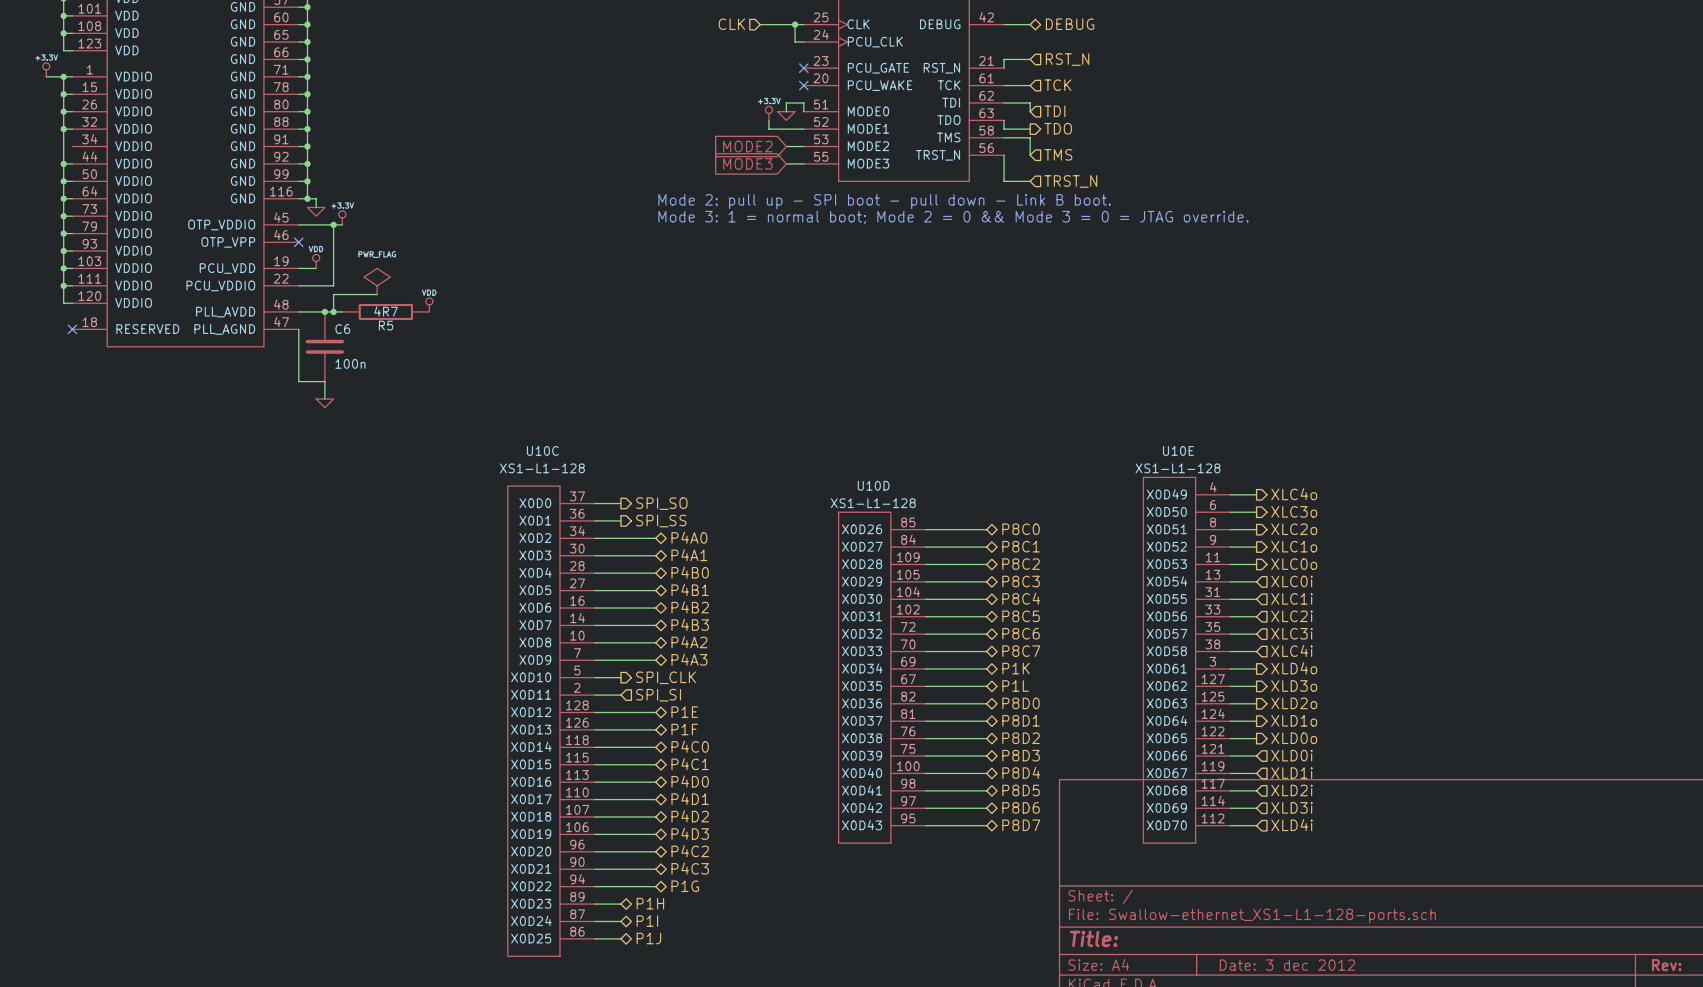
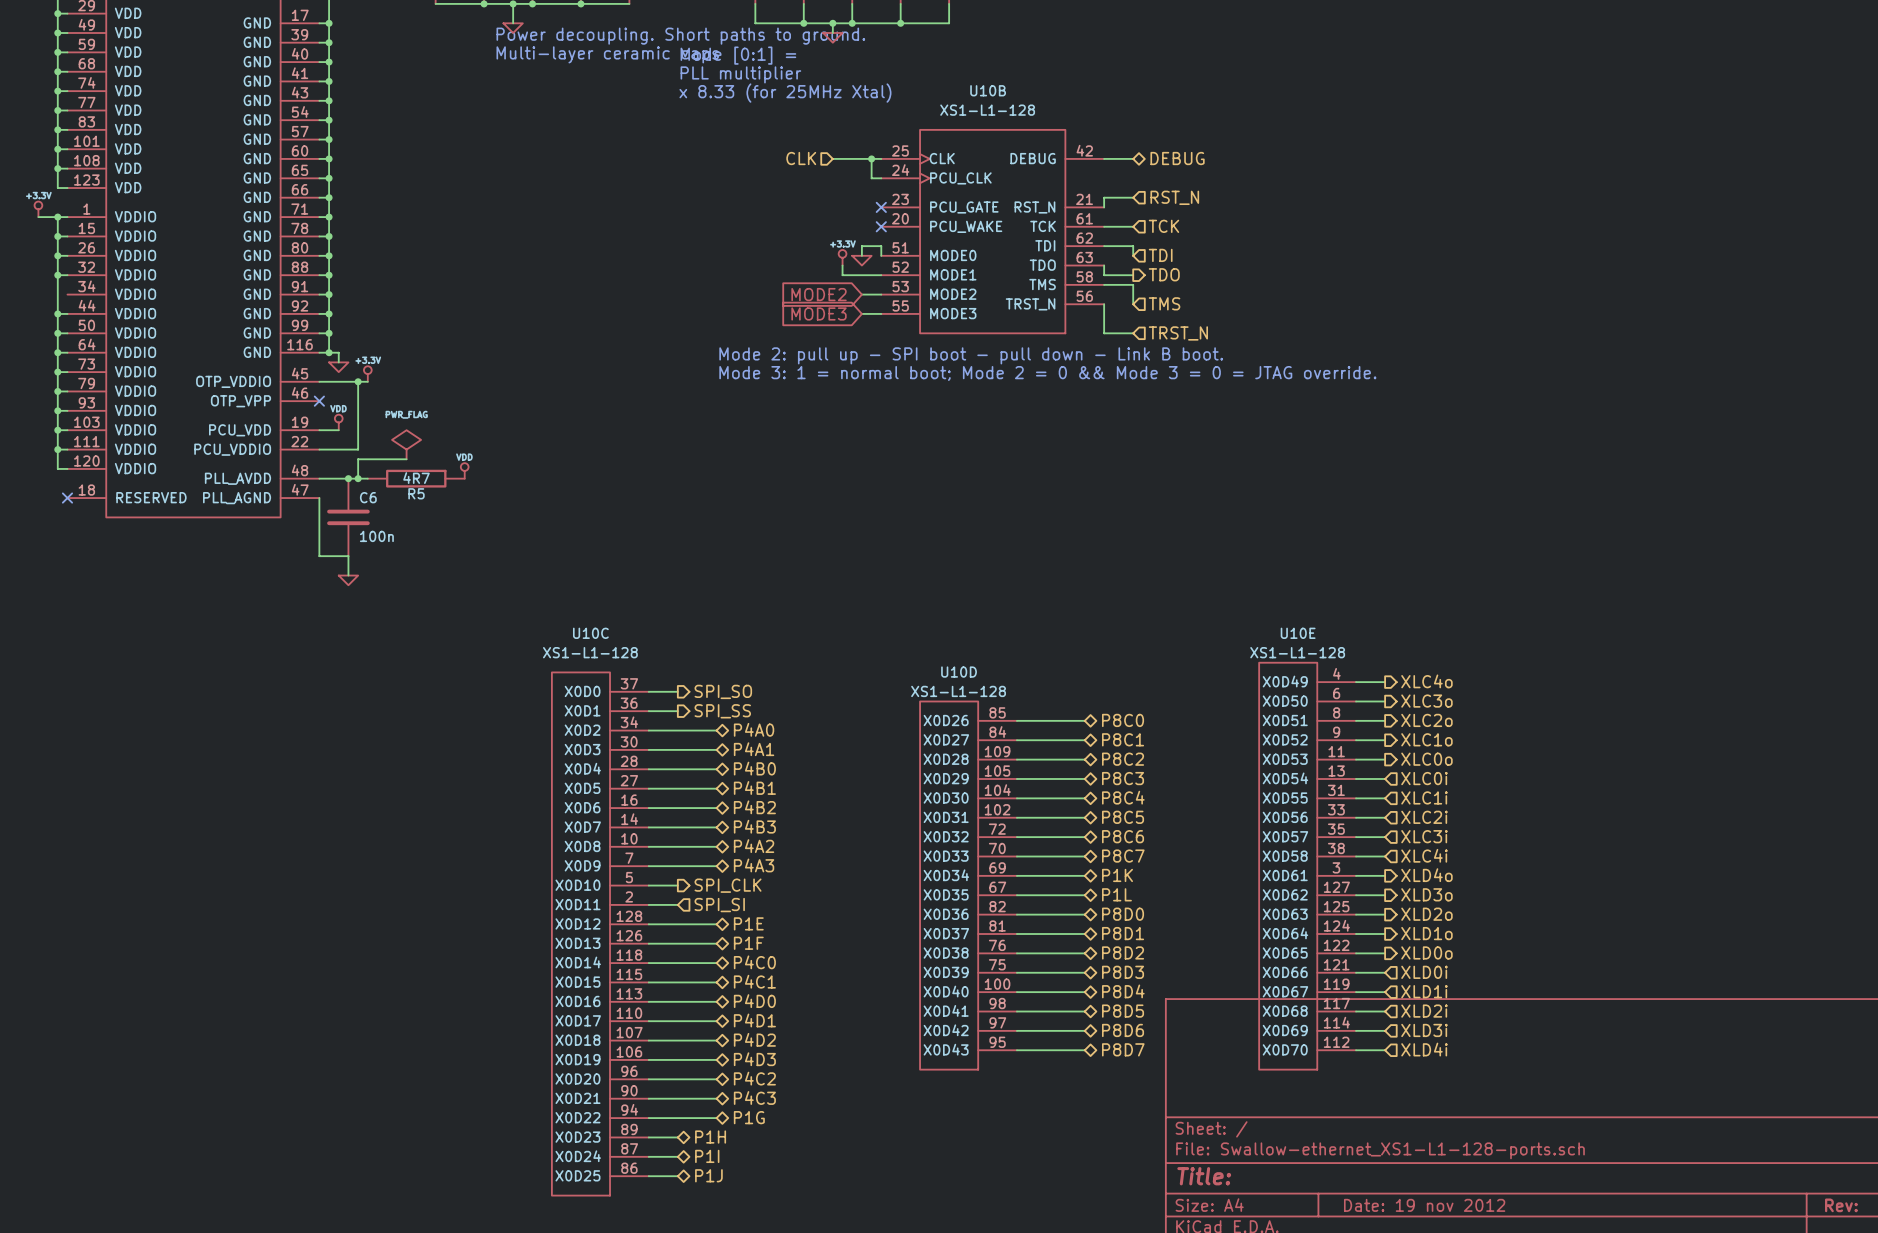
title block: Date: 3 dec 2012 (1287, 965) -> Date: 19 nov 2012 (1424, 1205)

